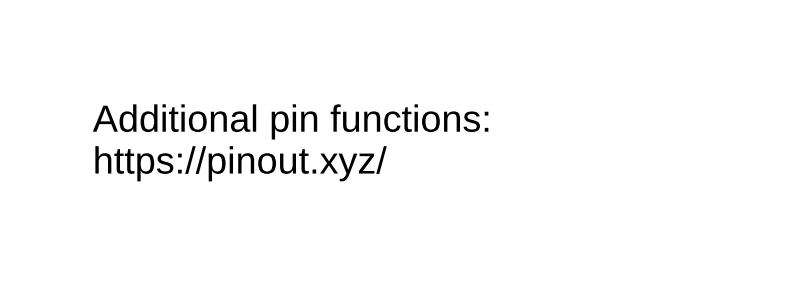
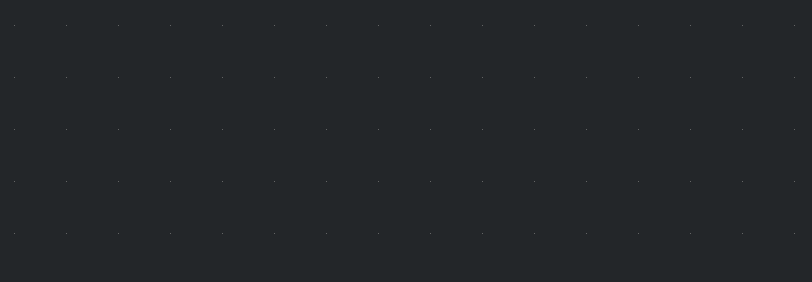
text: Additional pin functions: (290, 121) -> none
text: https://pinout.xyz/ (241, 163) -> none

